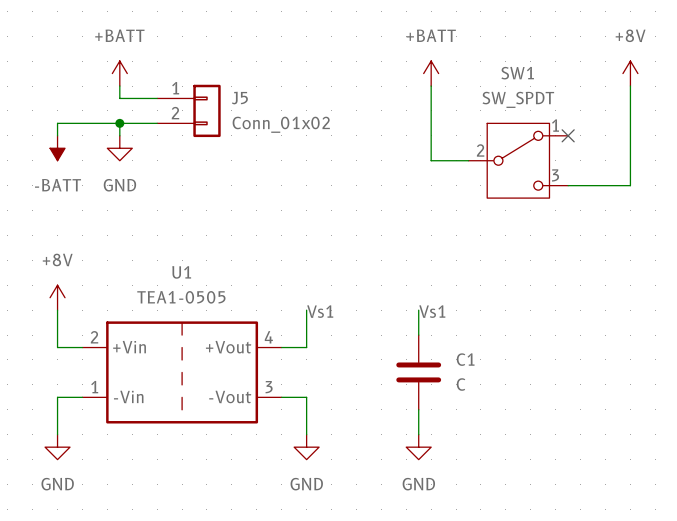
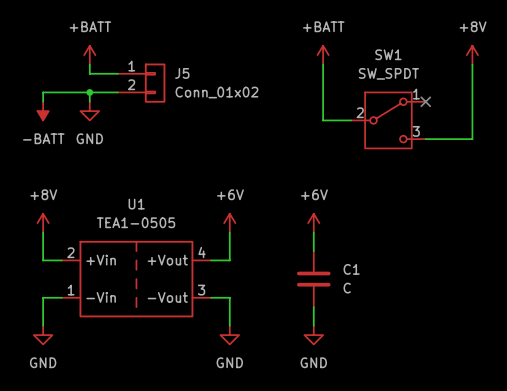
power symbol: none -> +6V (229, 223)
power symbol: none -> +6V (313, 223)
label: Vs1 (320, 311) -> none
label: Vs1 (432, 311) -> none

